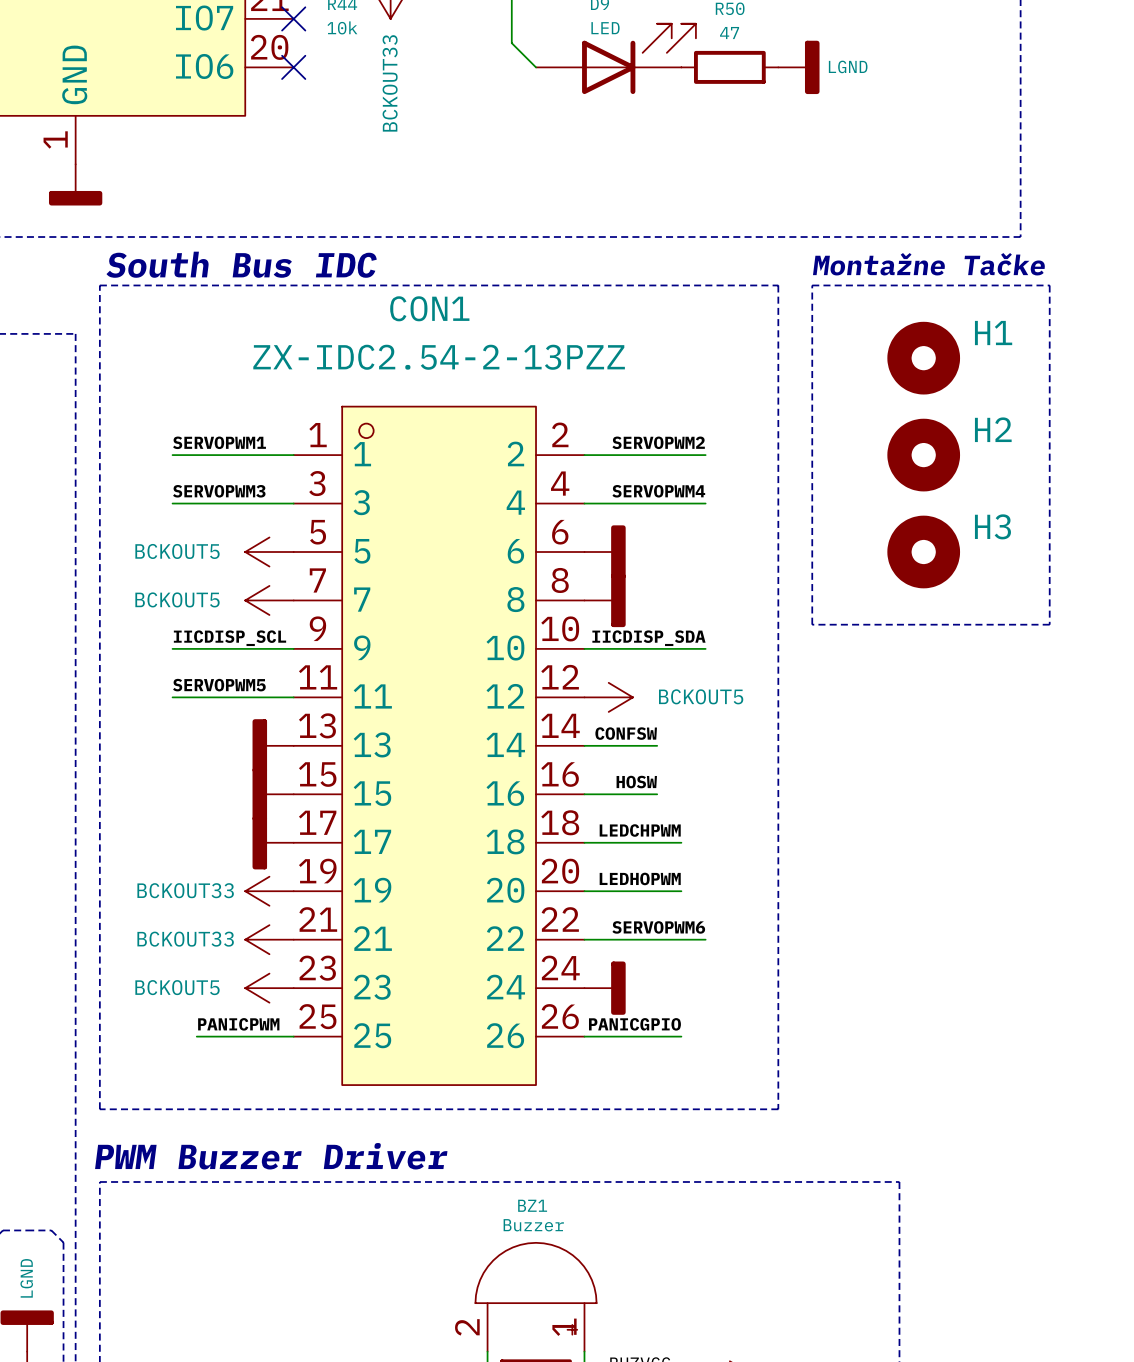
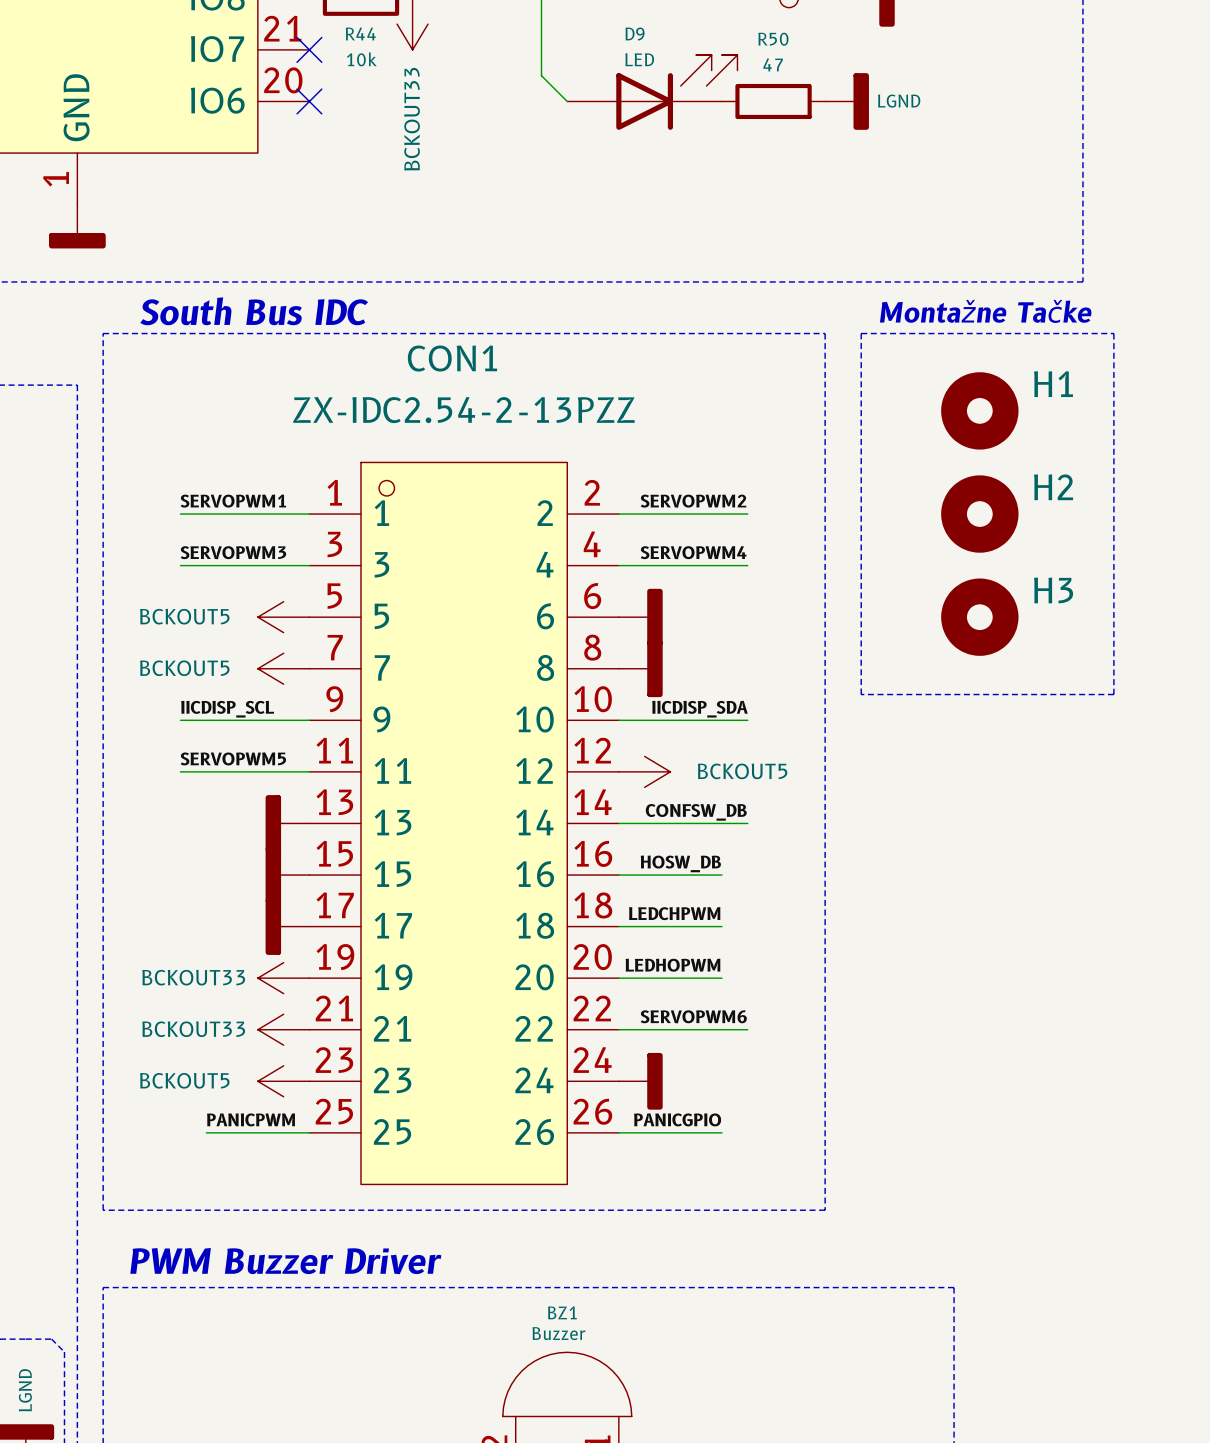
label: CONFSW (626, 733) -> CONFSW_DB (696, 812)
wire: none -> (696, 823) (747, 823)
label: HOSW (636, 782) -> HOSW_DB (680, 863)
wire: none -> (696, 875) (721, 875)

